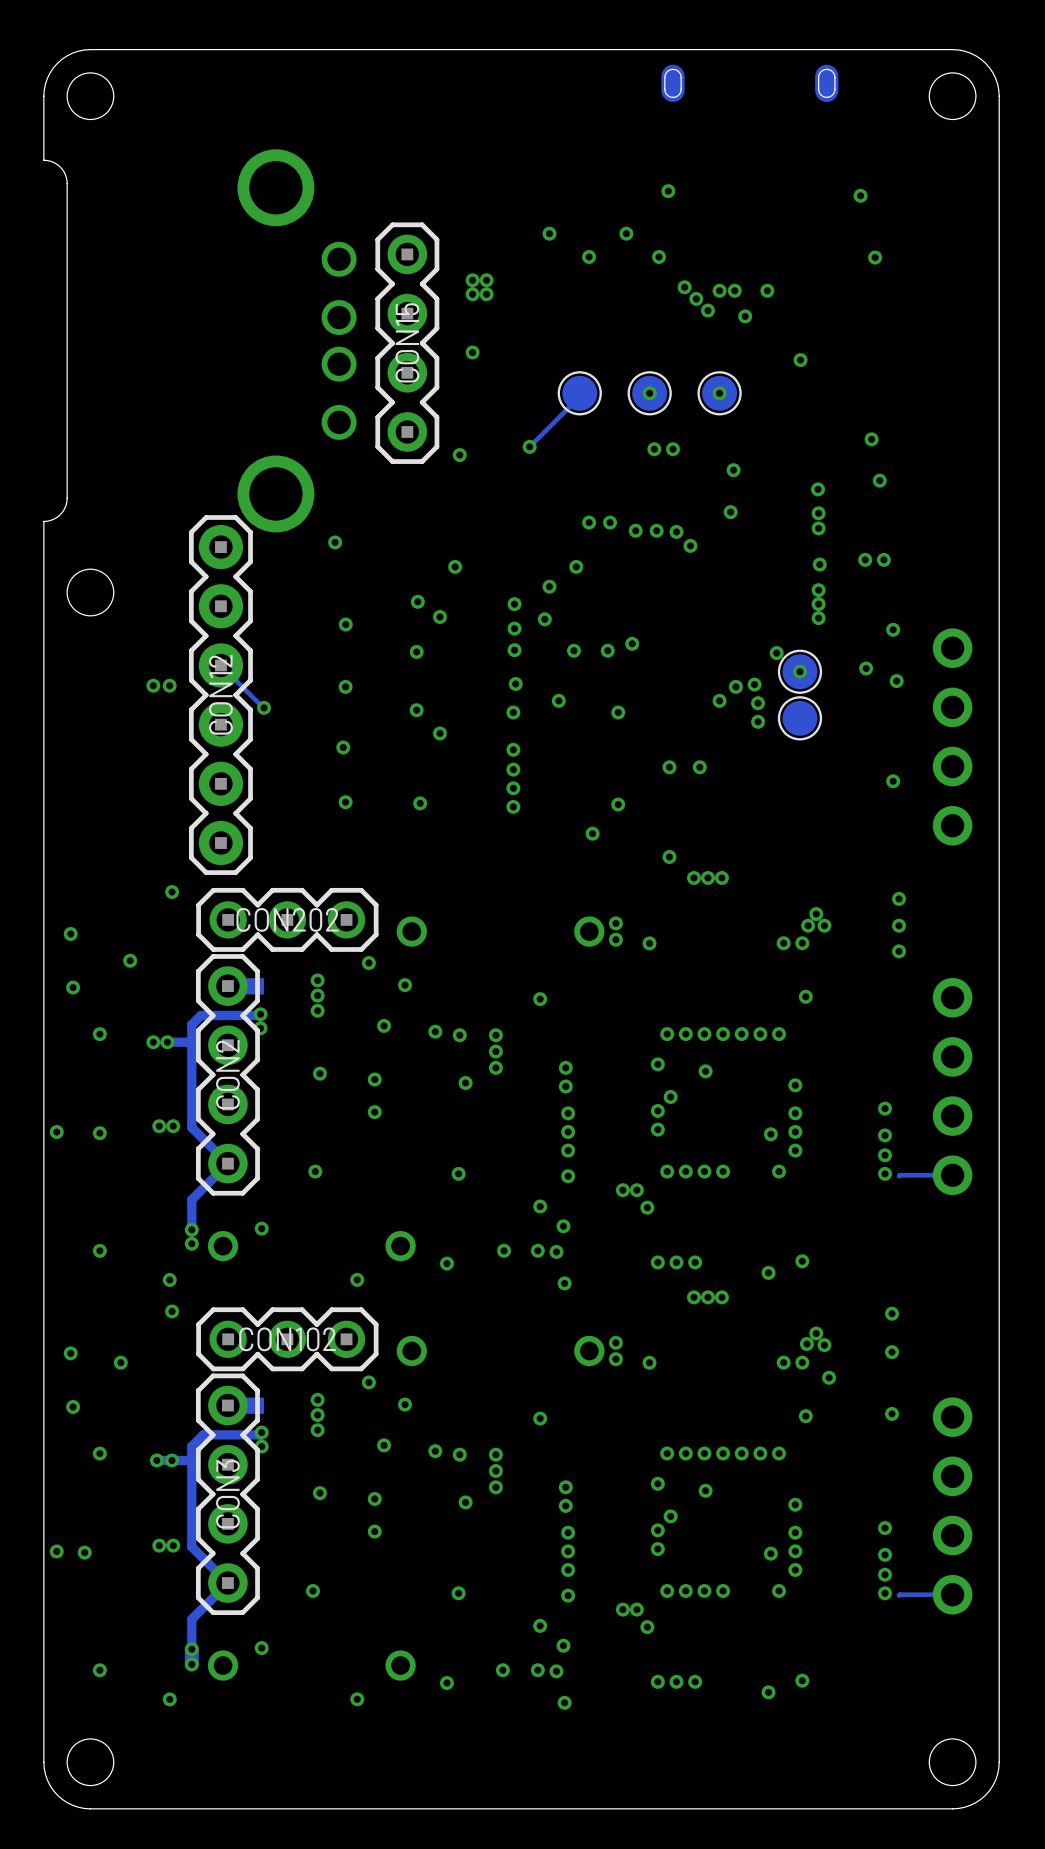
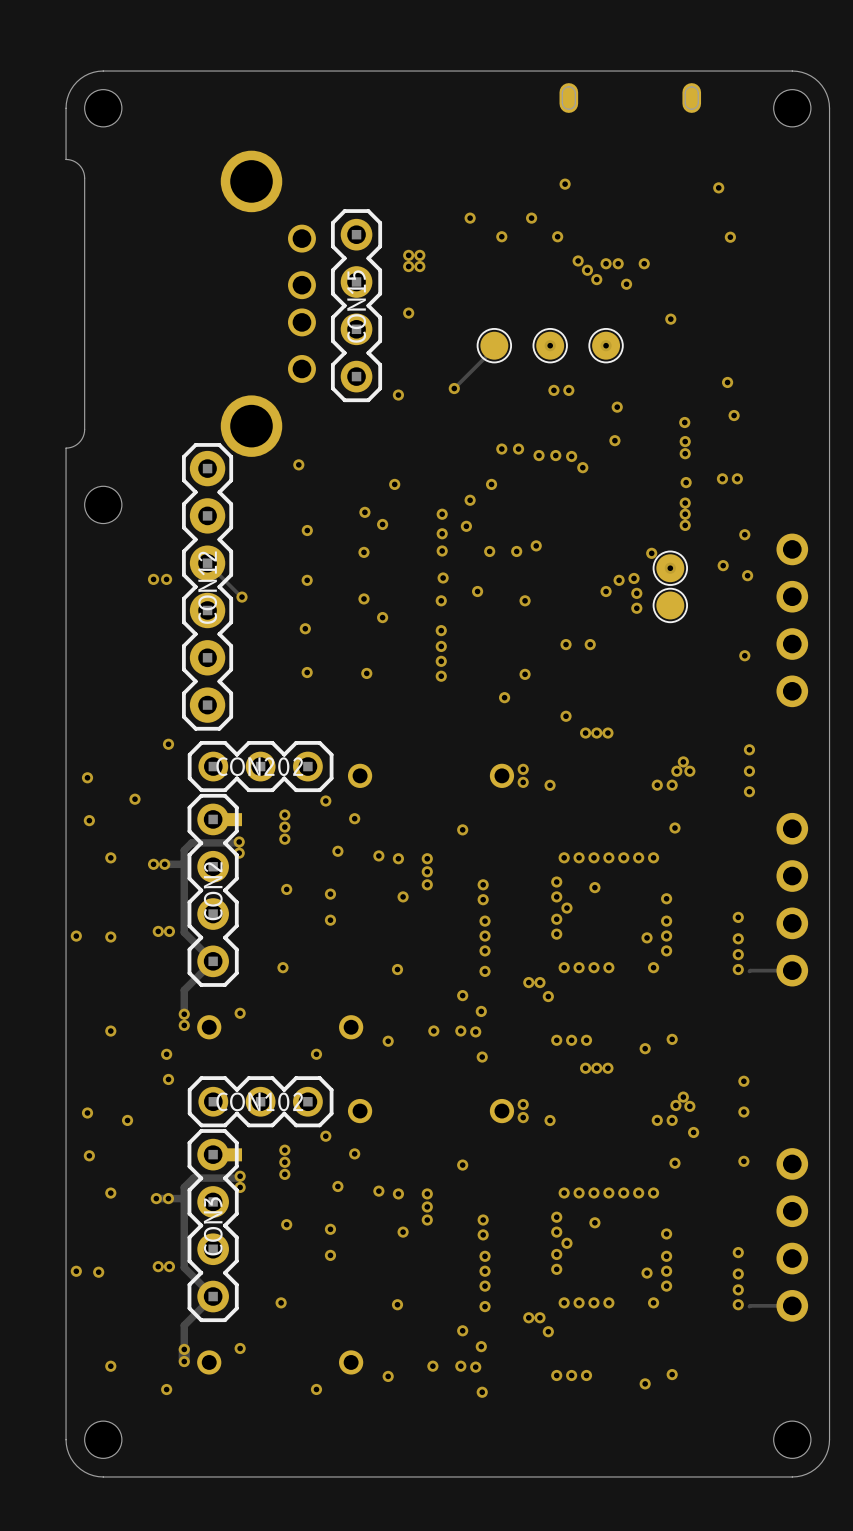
via: none -> (556, 896)
via: none -> (556, 1232)

